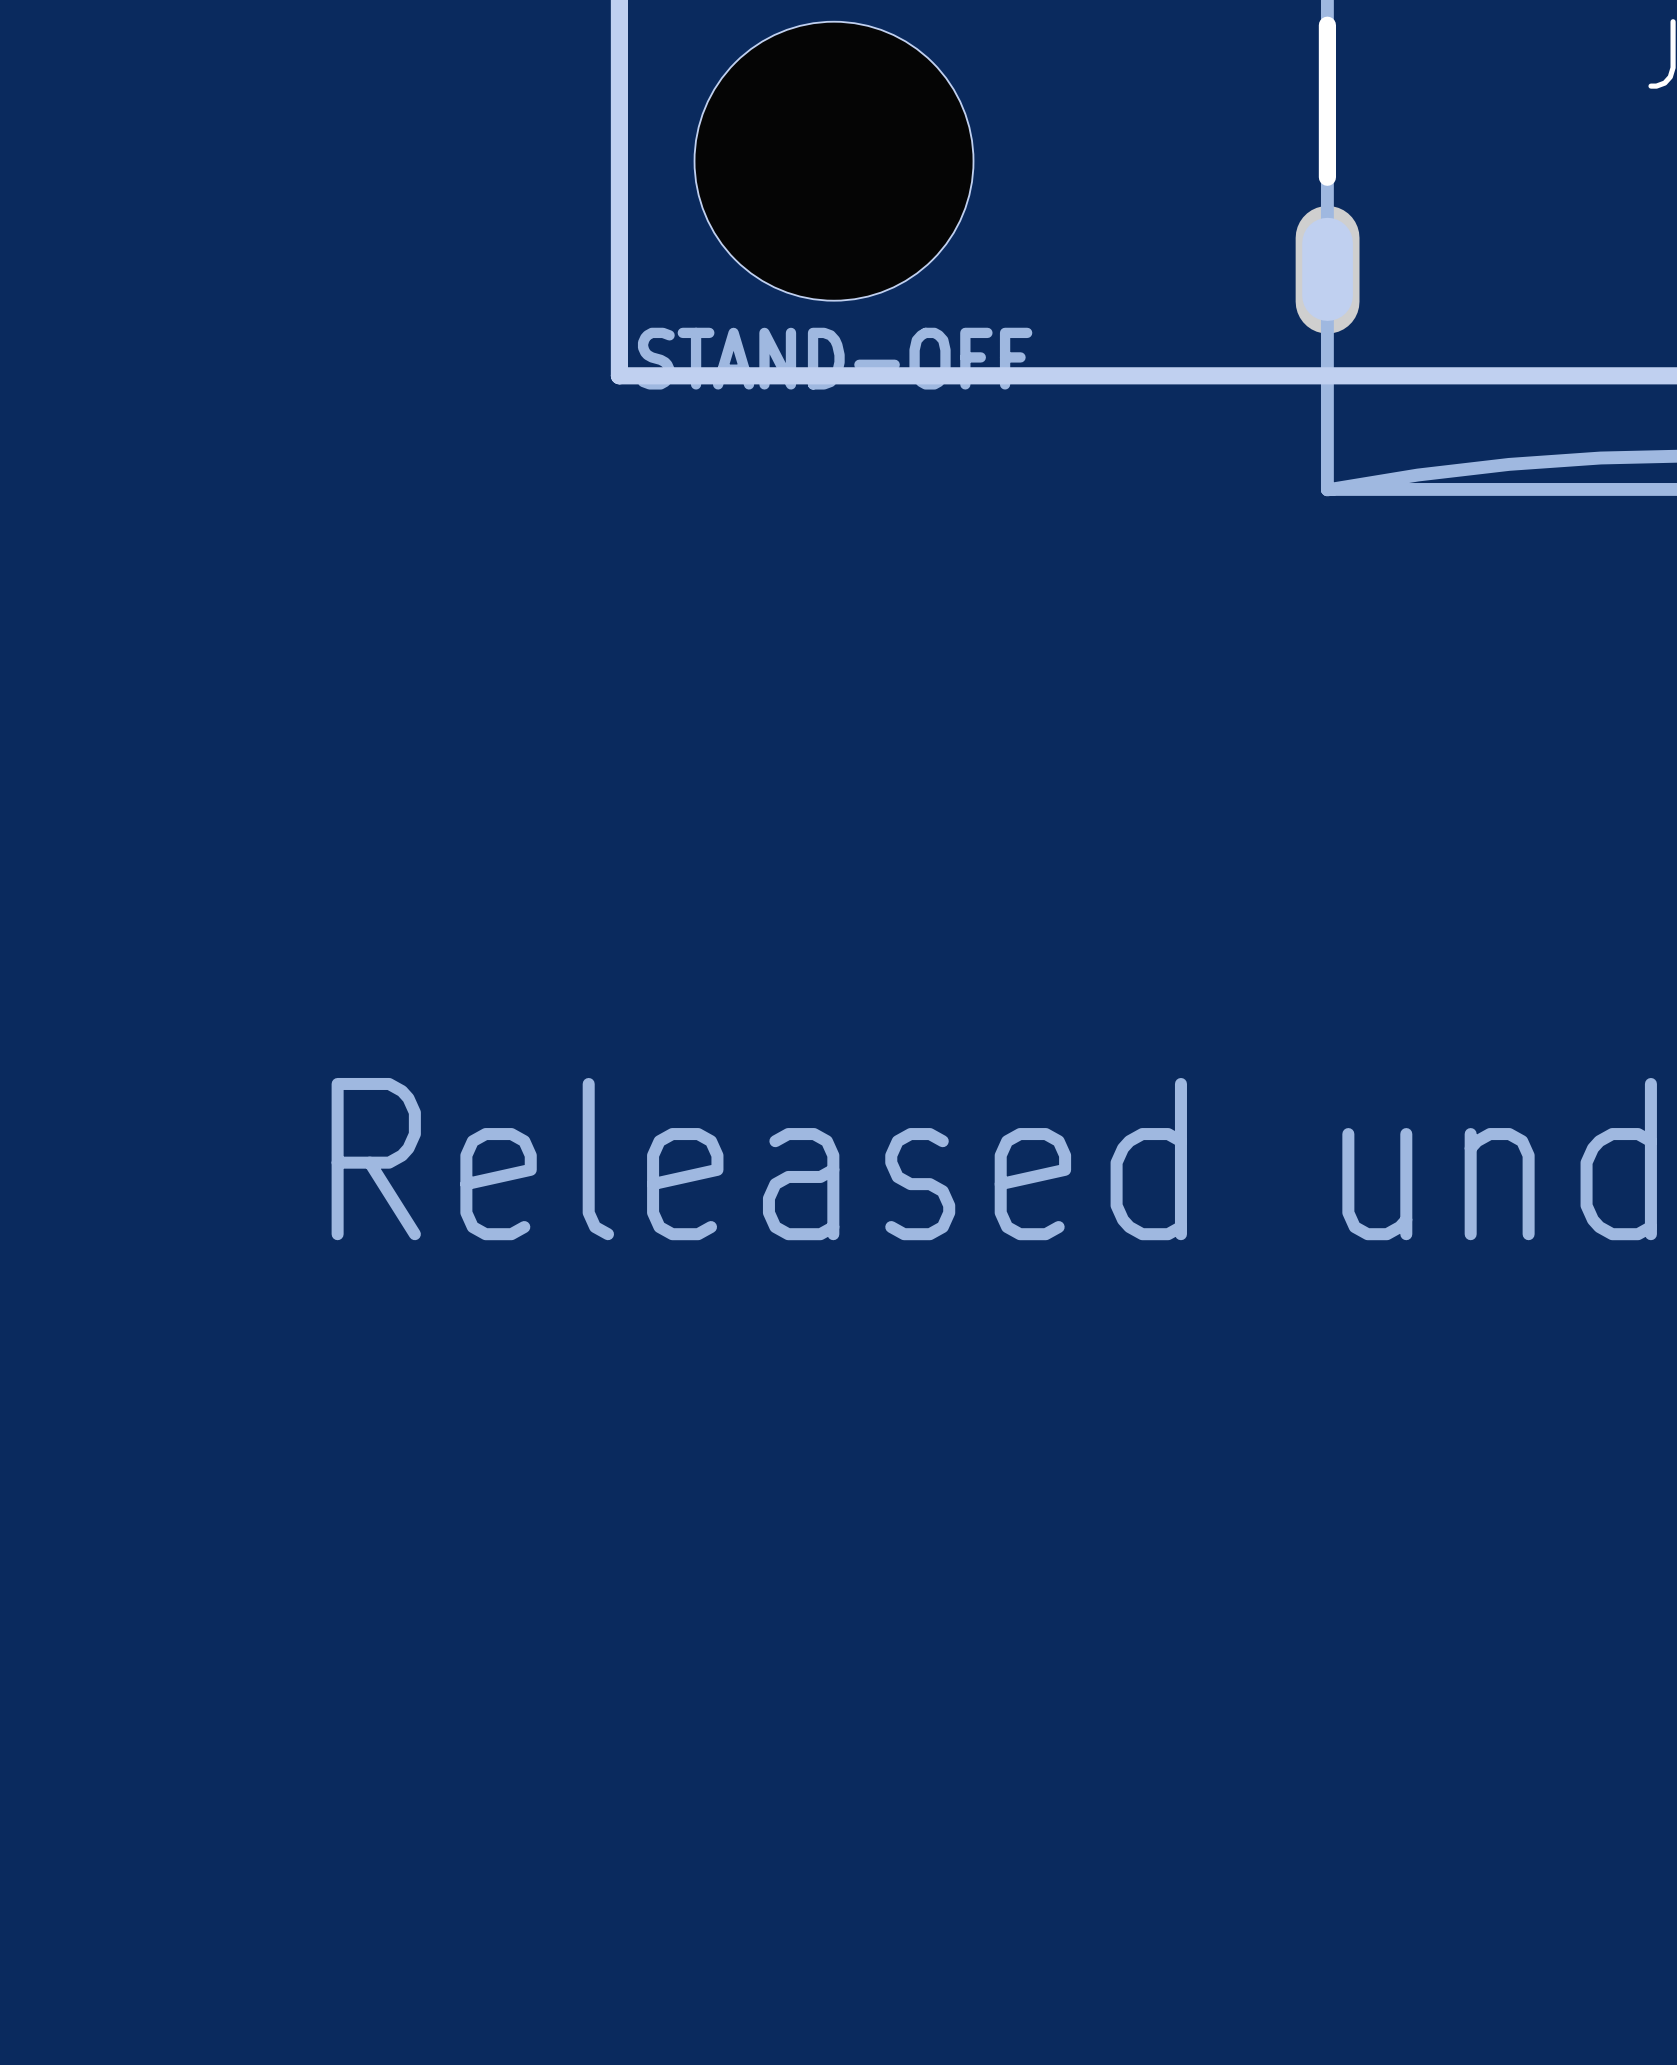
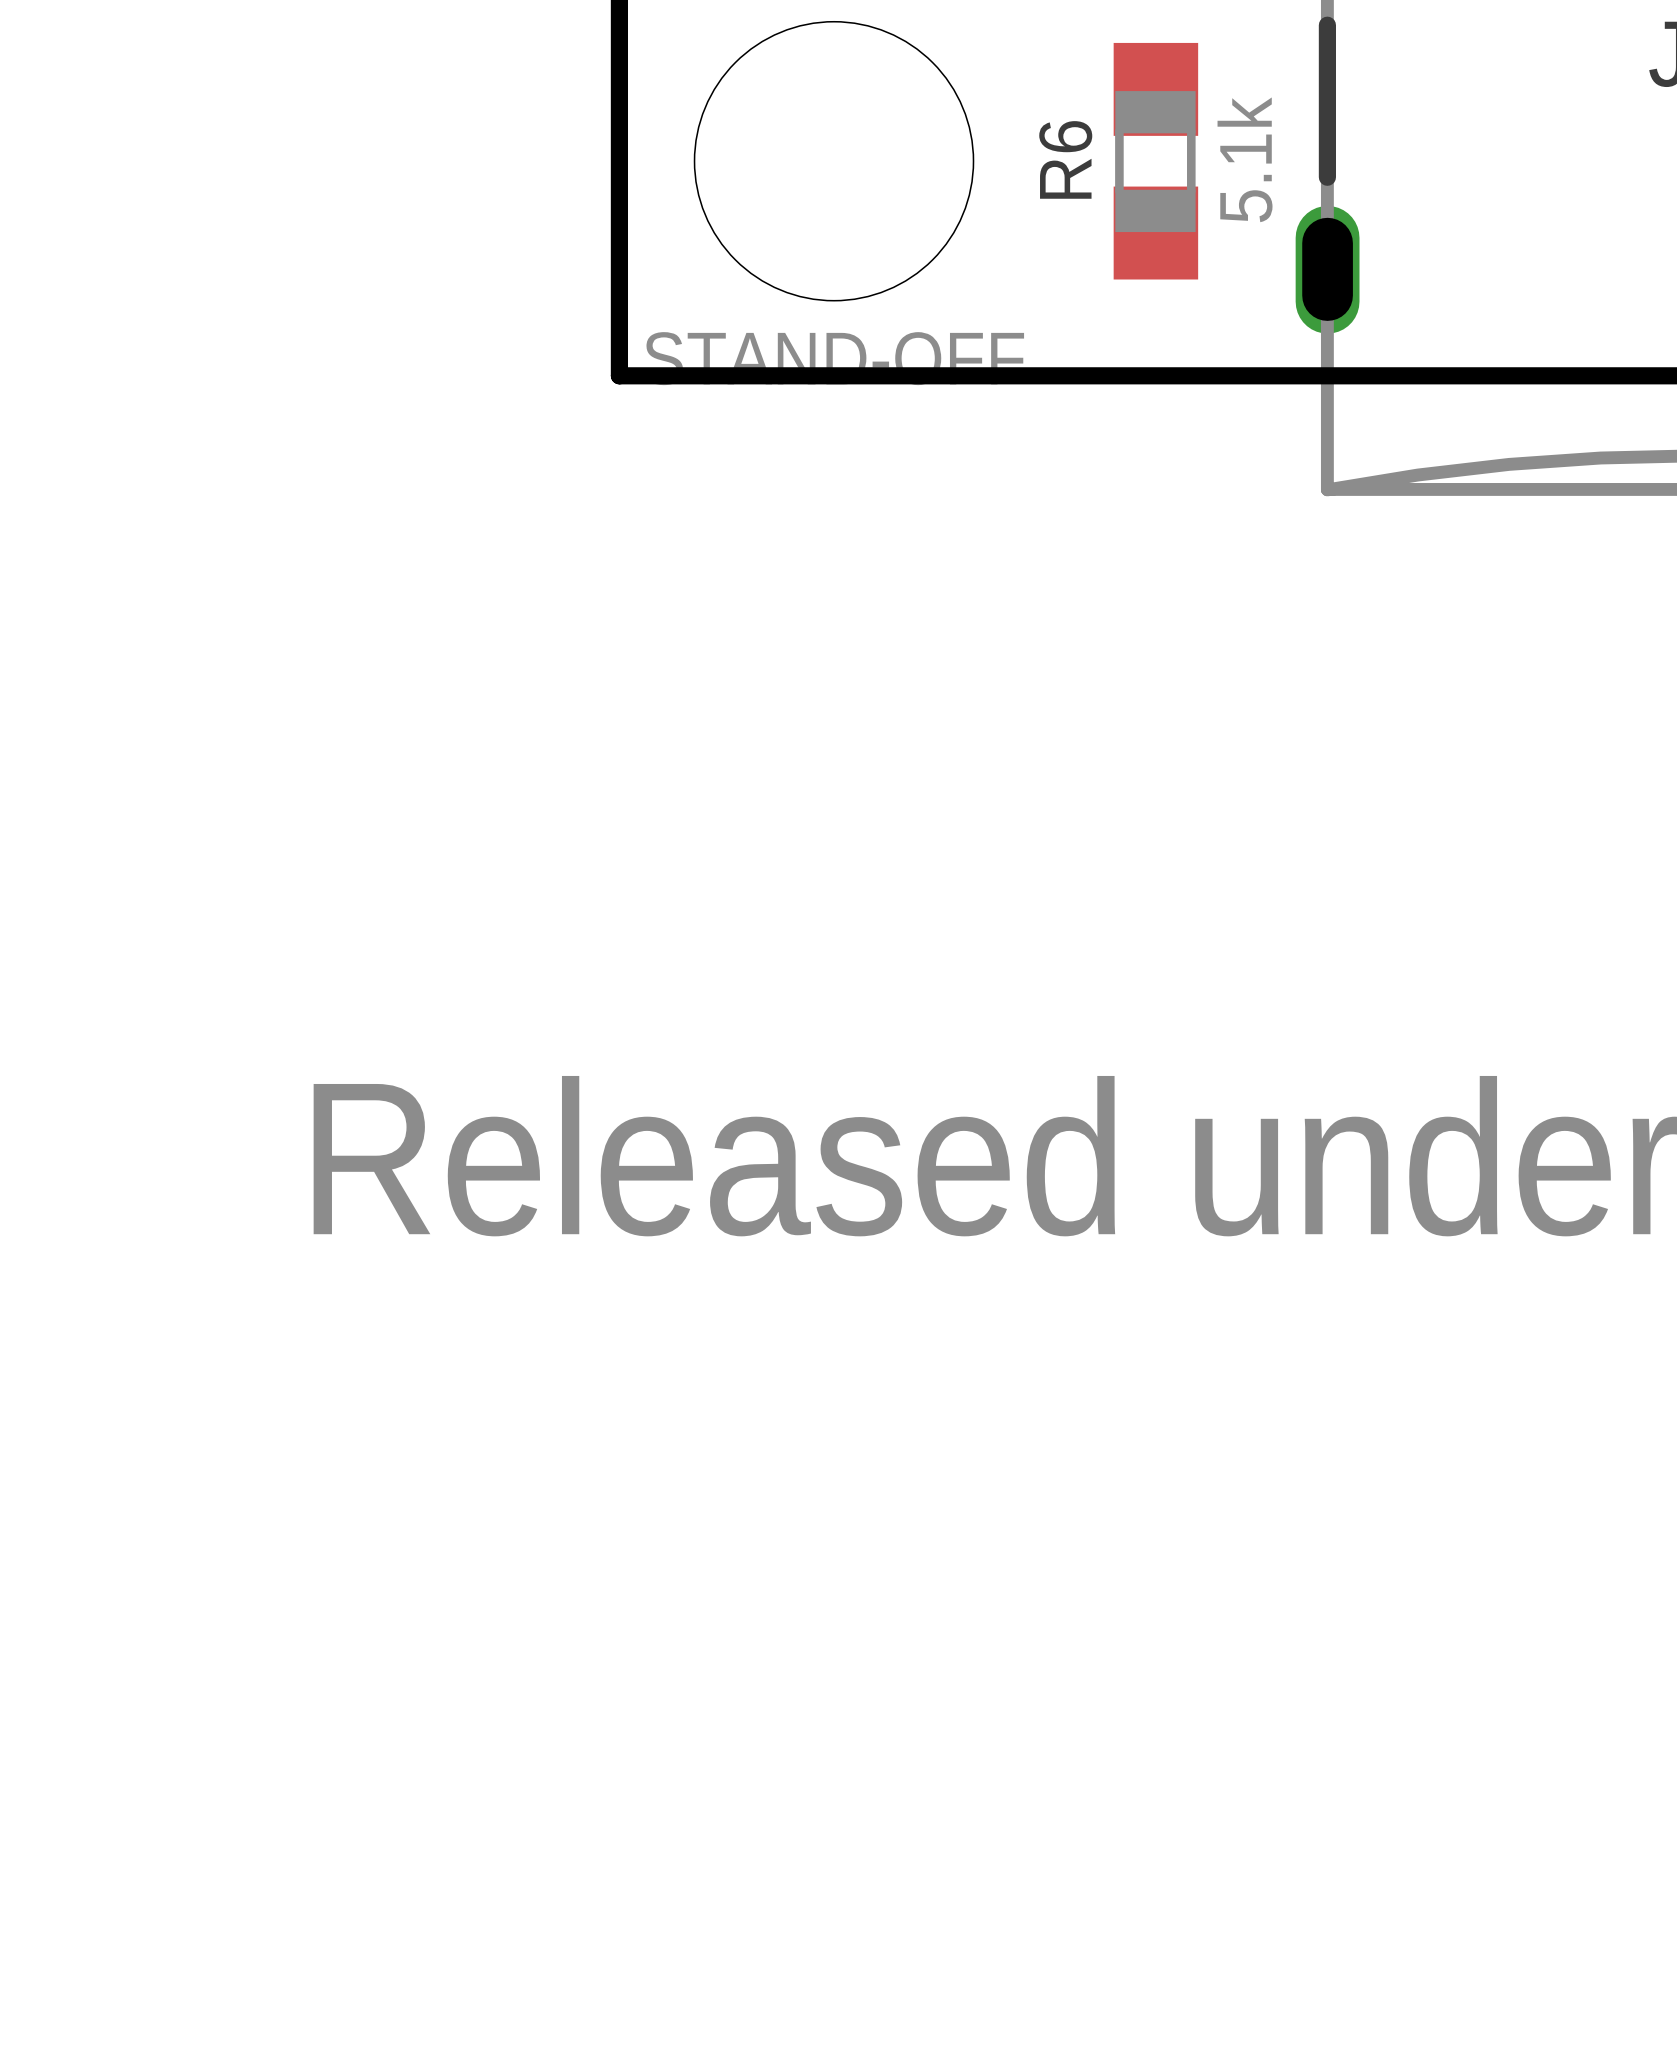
R6: none -> 5.1k (1155, 161)

